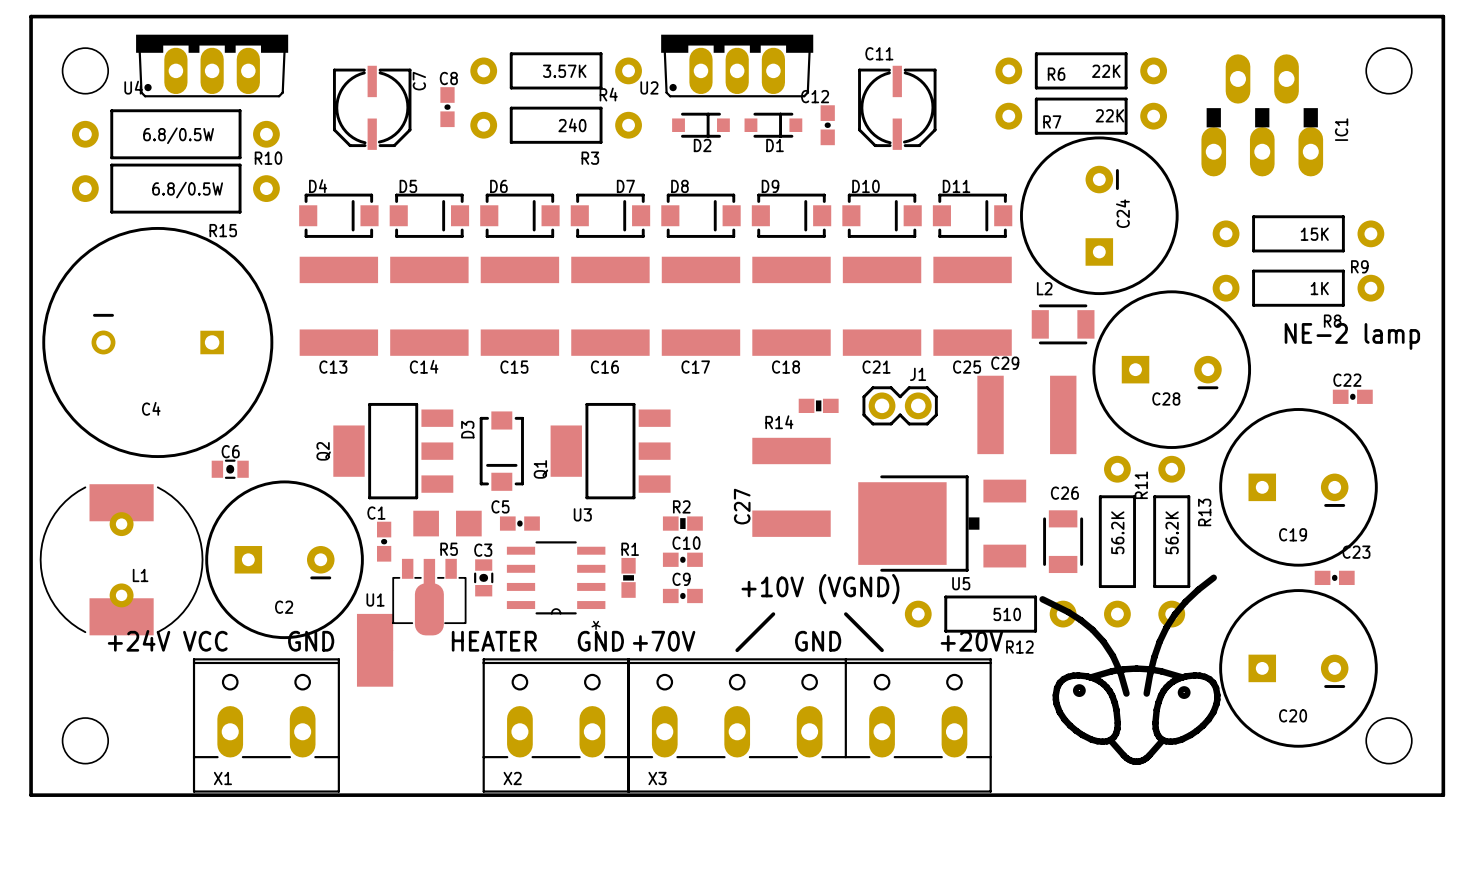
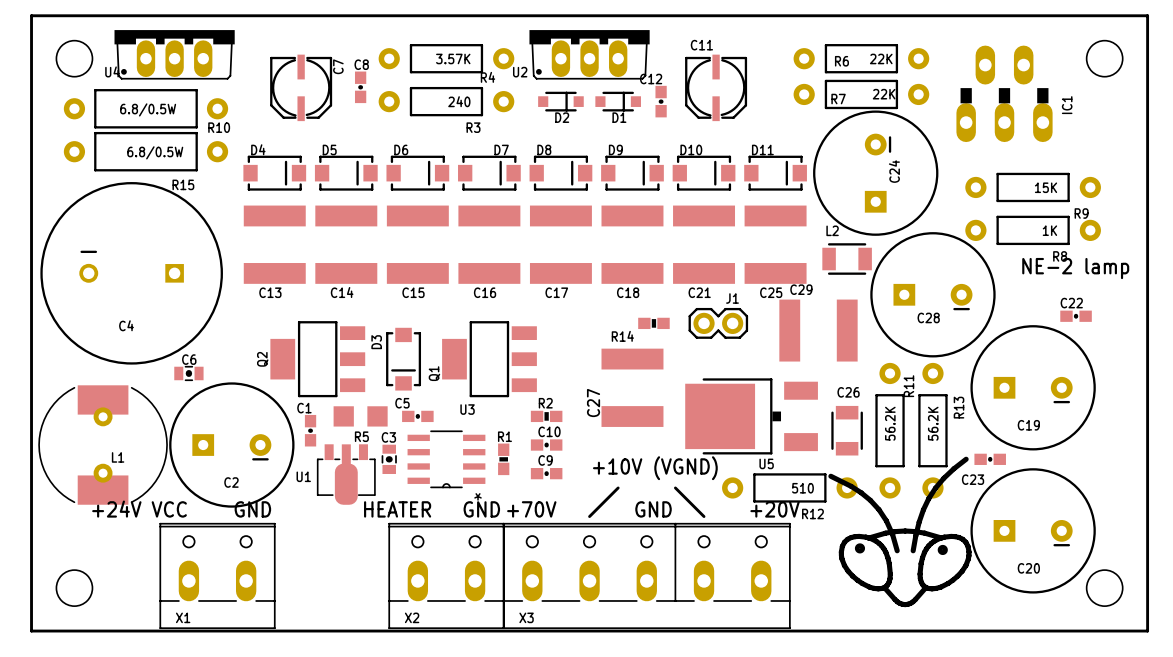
C23 name position: C23 (1356, 552) -> C23 (973, 479)
C23 position: (1334, 577) -> (990, 459)
part: (375, 650) -> none

